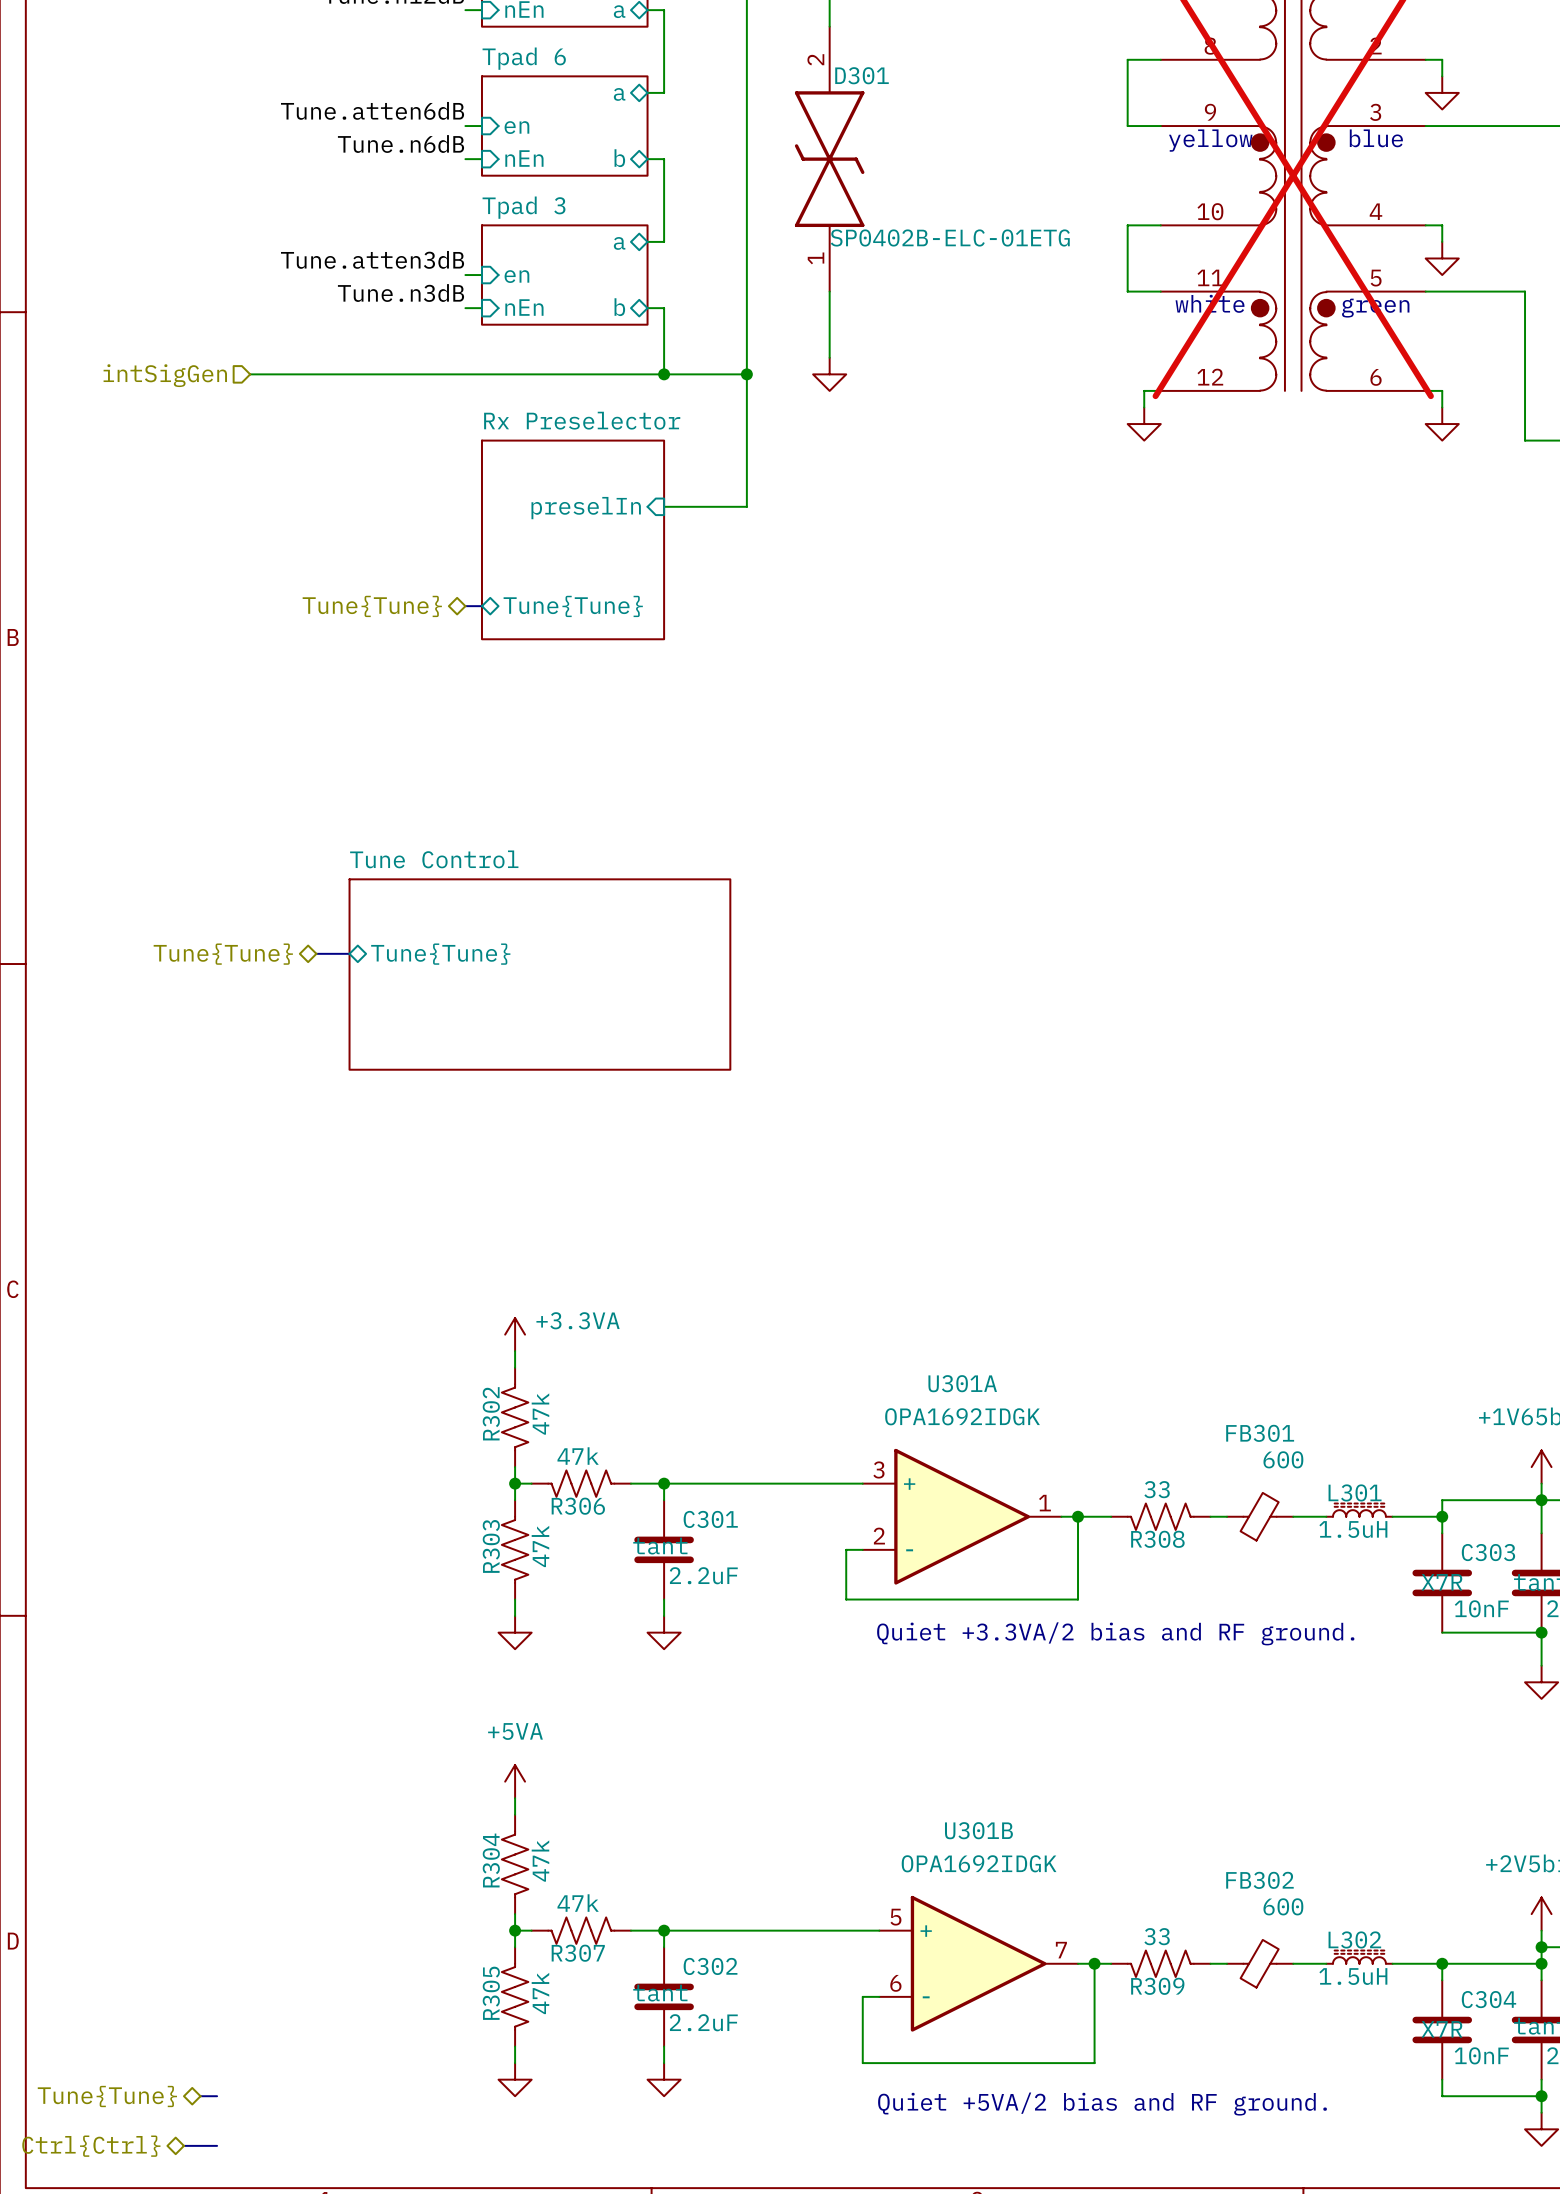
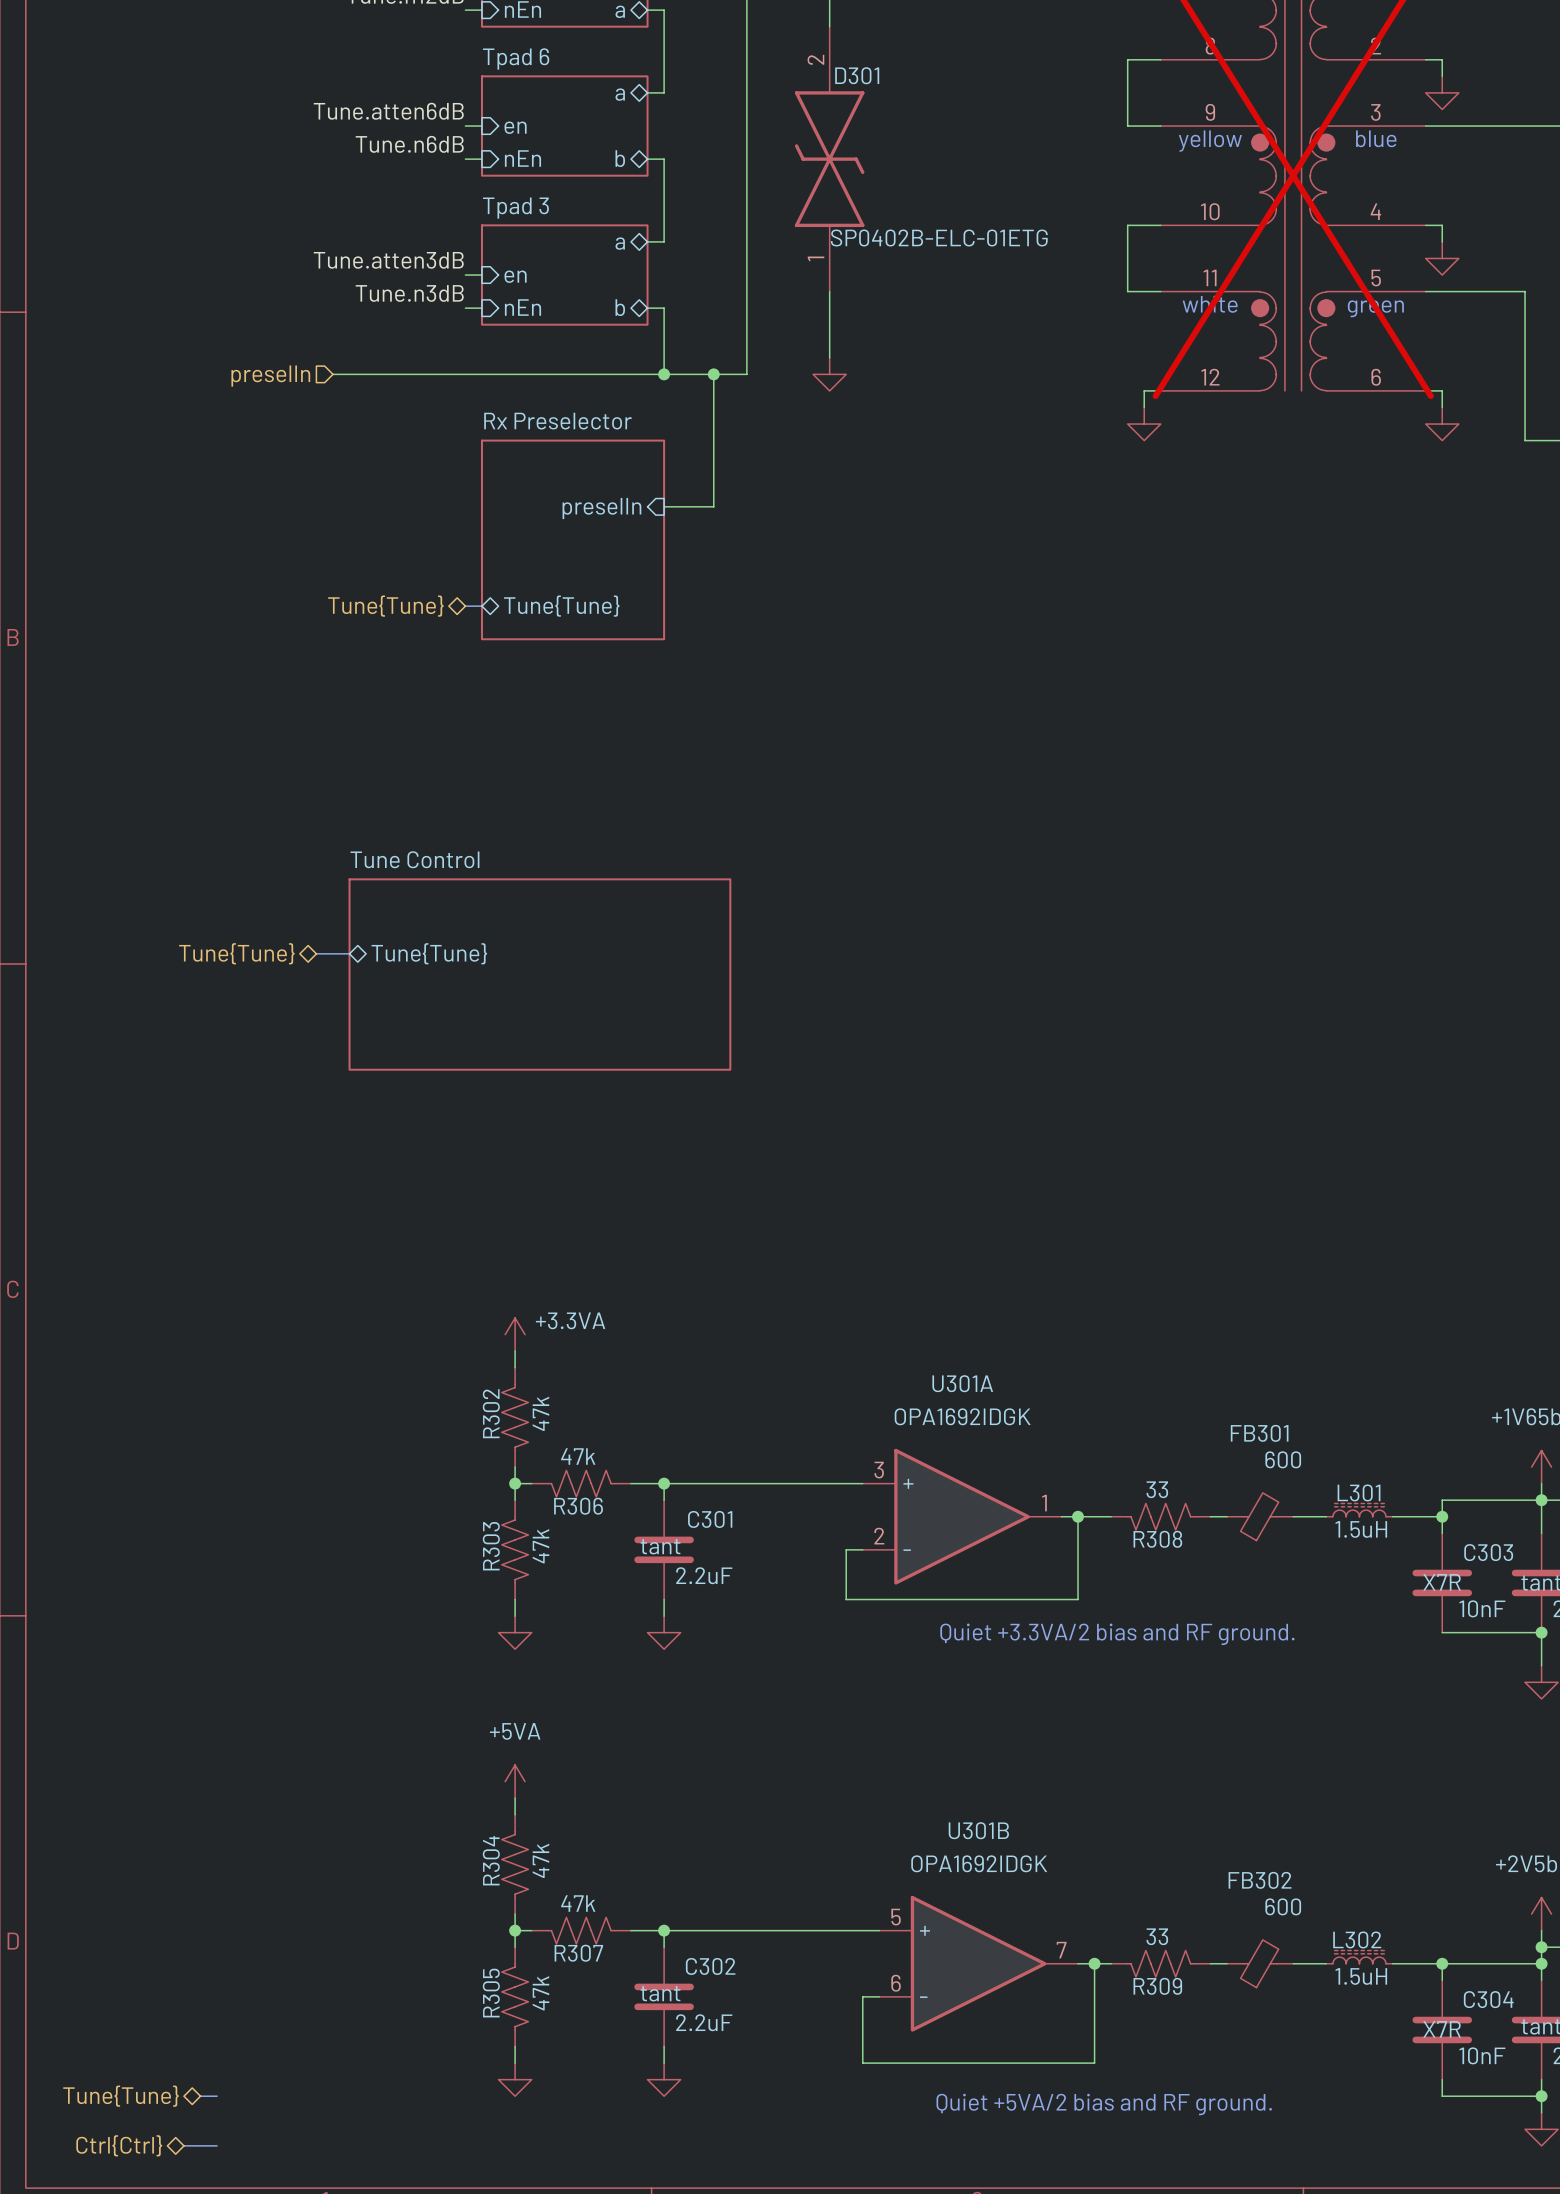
wire: (250, 374) (332, 374) -> none
wire: (746, 374) (746, 506) (713, 506) -> (713, 374) (713, 506)
junction position: (746, 374) -> (713, 374)
hierarchical label: intSigGen (165, 375) -> none
hierarchical label: none -> preselIn (270, 376)

